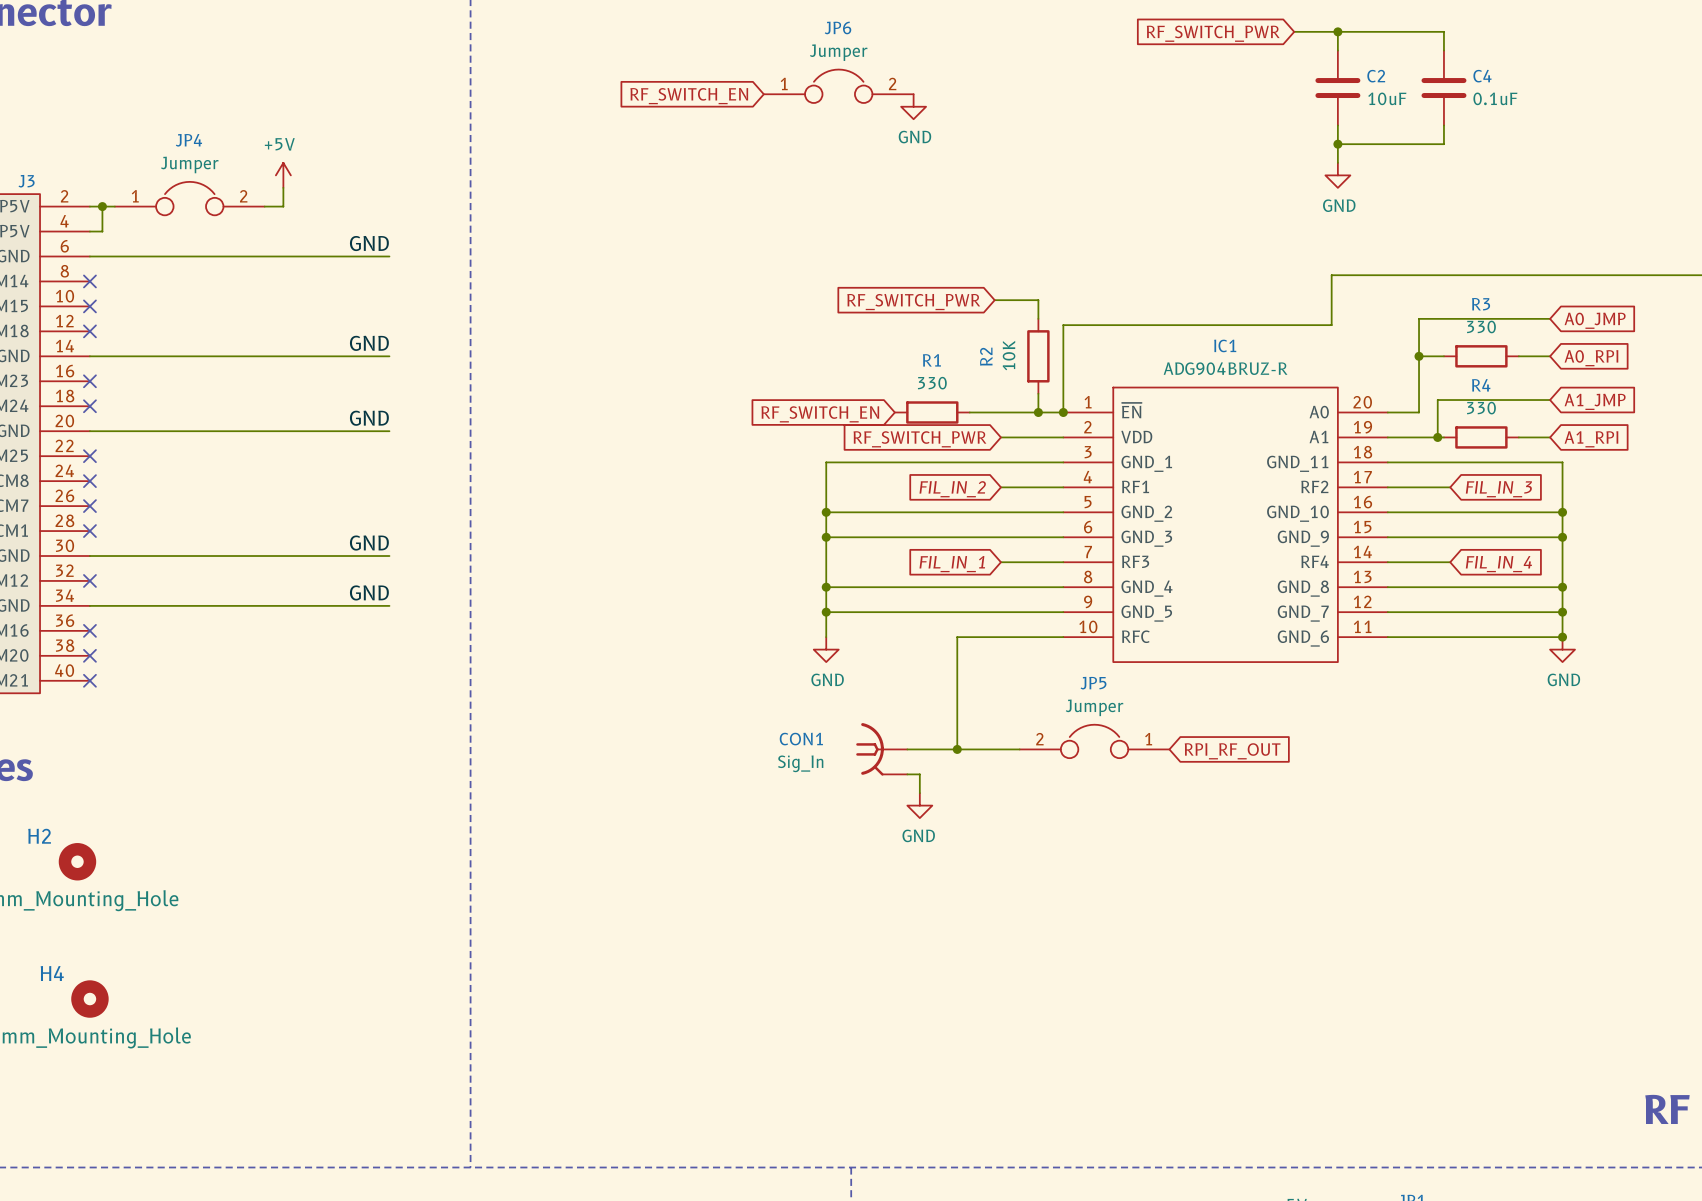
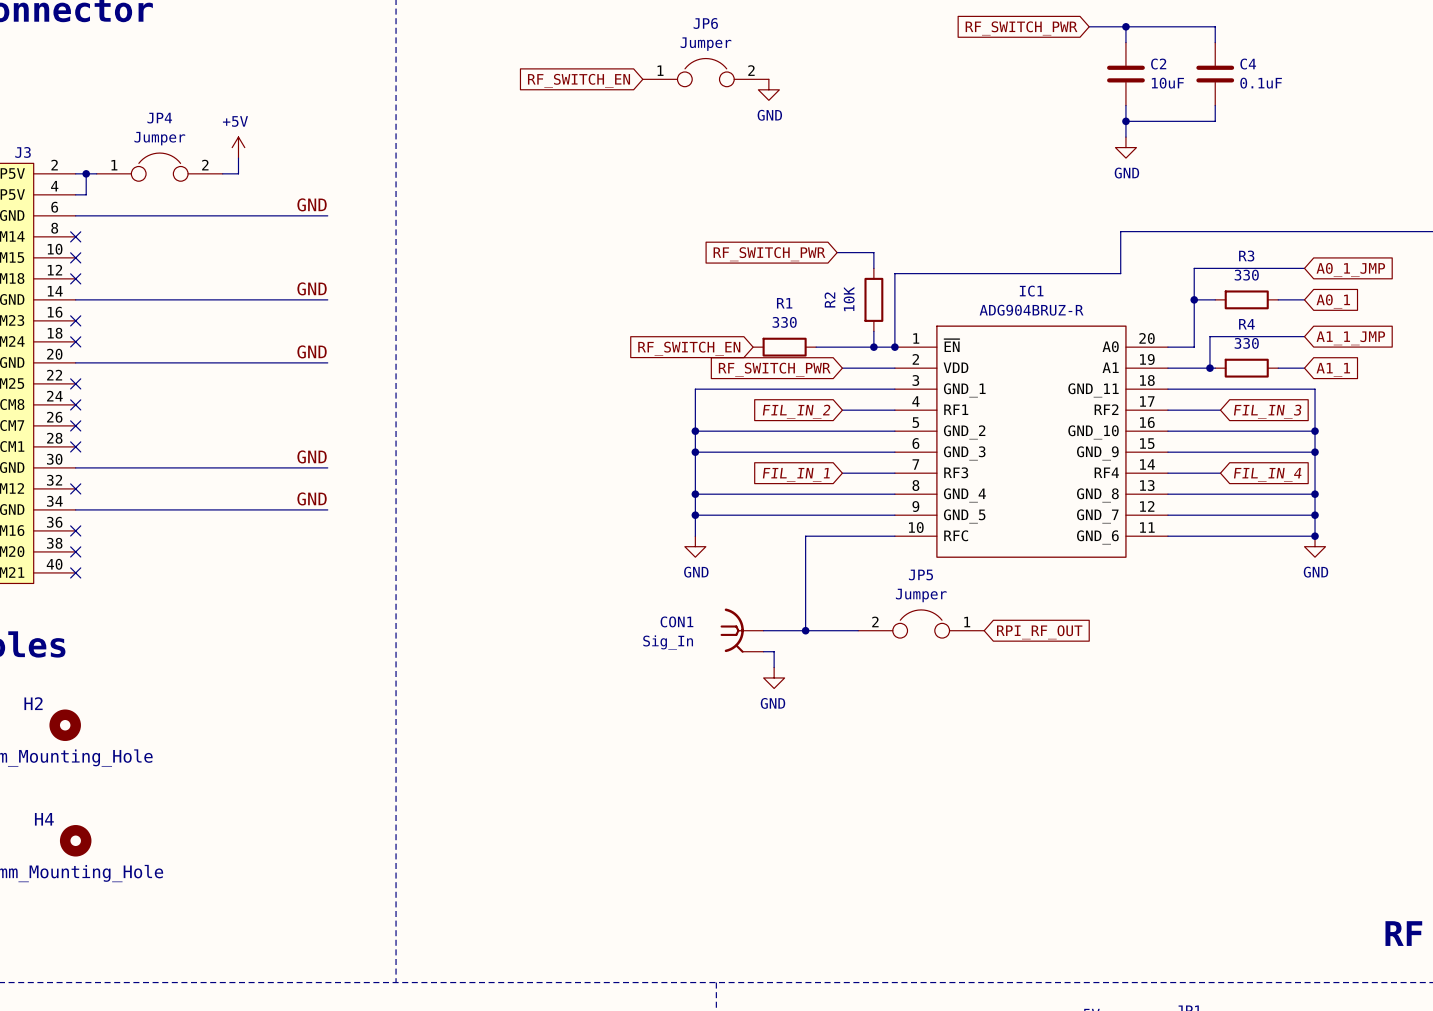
global label: A0_JMP (1595, 320) -> A0_1_JMP (1350, 269)
global label: A0_RPI (1591, 358) -> A0_1 (1333, 301)
global label: A1_JMP (1595, 401) -> A1_1_JMP (1350, 338)
global label: A1_RPI (1591, 439) -> A1_1 (1333, 369)

